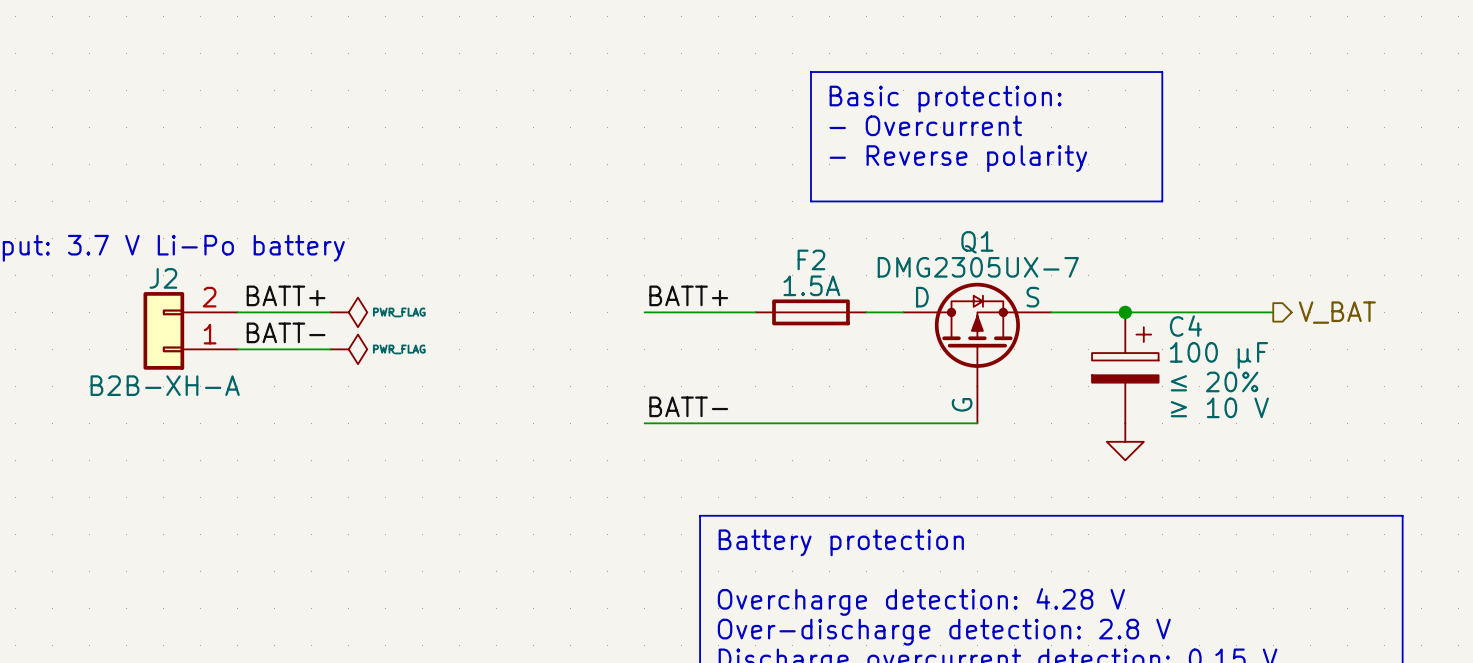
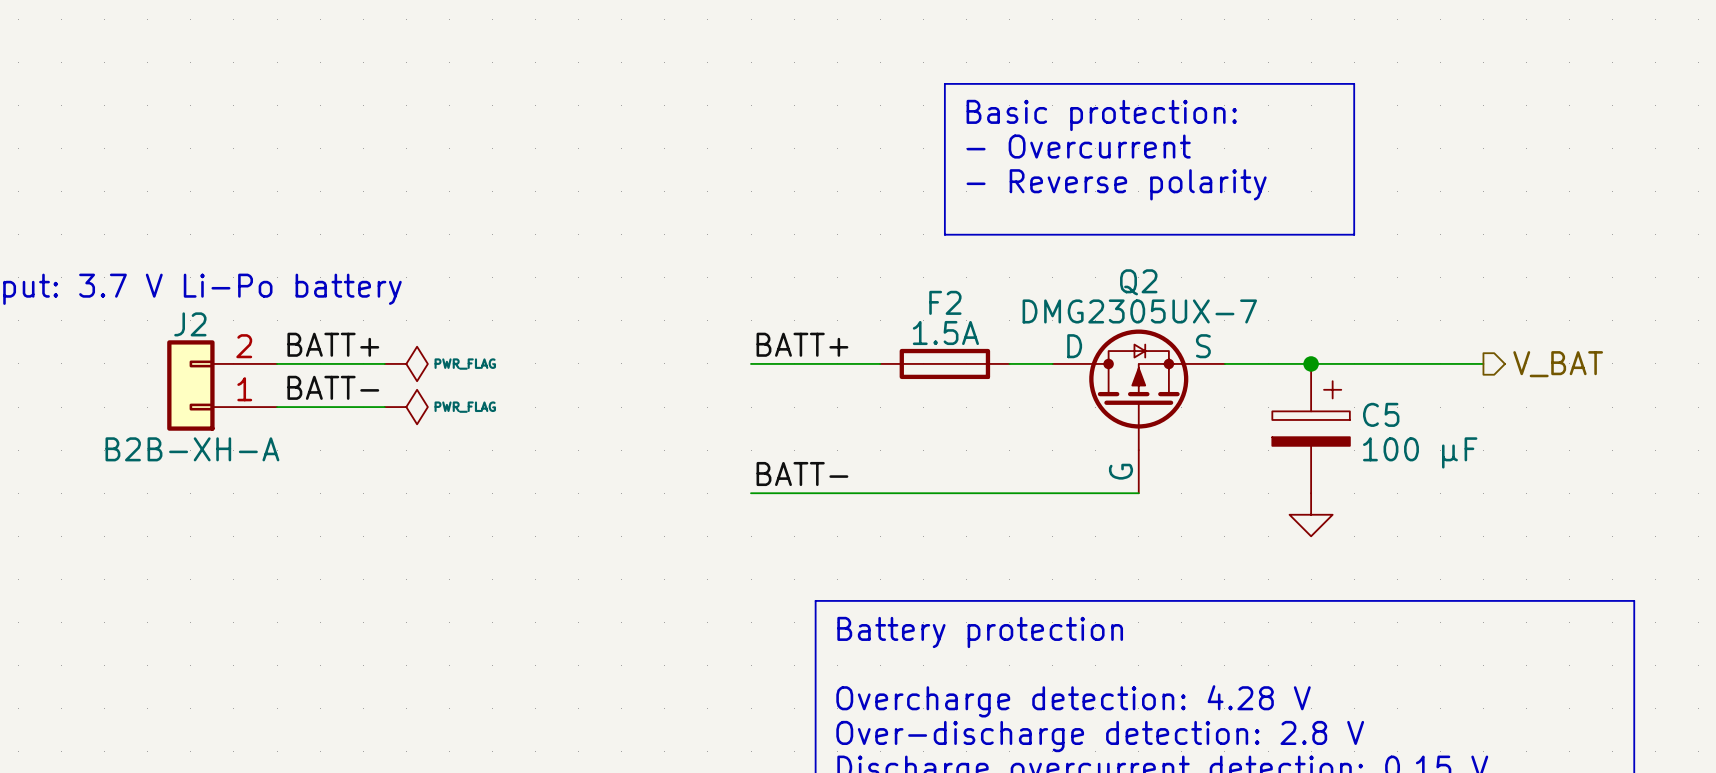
Q1 name: Q1 (977, 242) -> Q2 (1138, 282)
C4 name: C4 (1185, 326) -> C5 (1381, 414)
C4 value position: 100 μF (1218, 355) -> 100 μF (1420, 452)
C4 text: ≤ 20% (1214, 381) -> none
C4 text: ≥ 10 V (1219, 407) -> none

